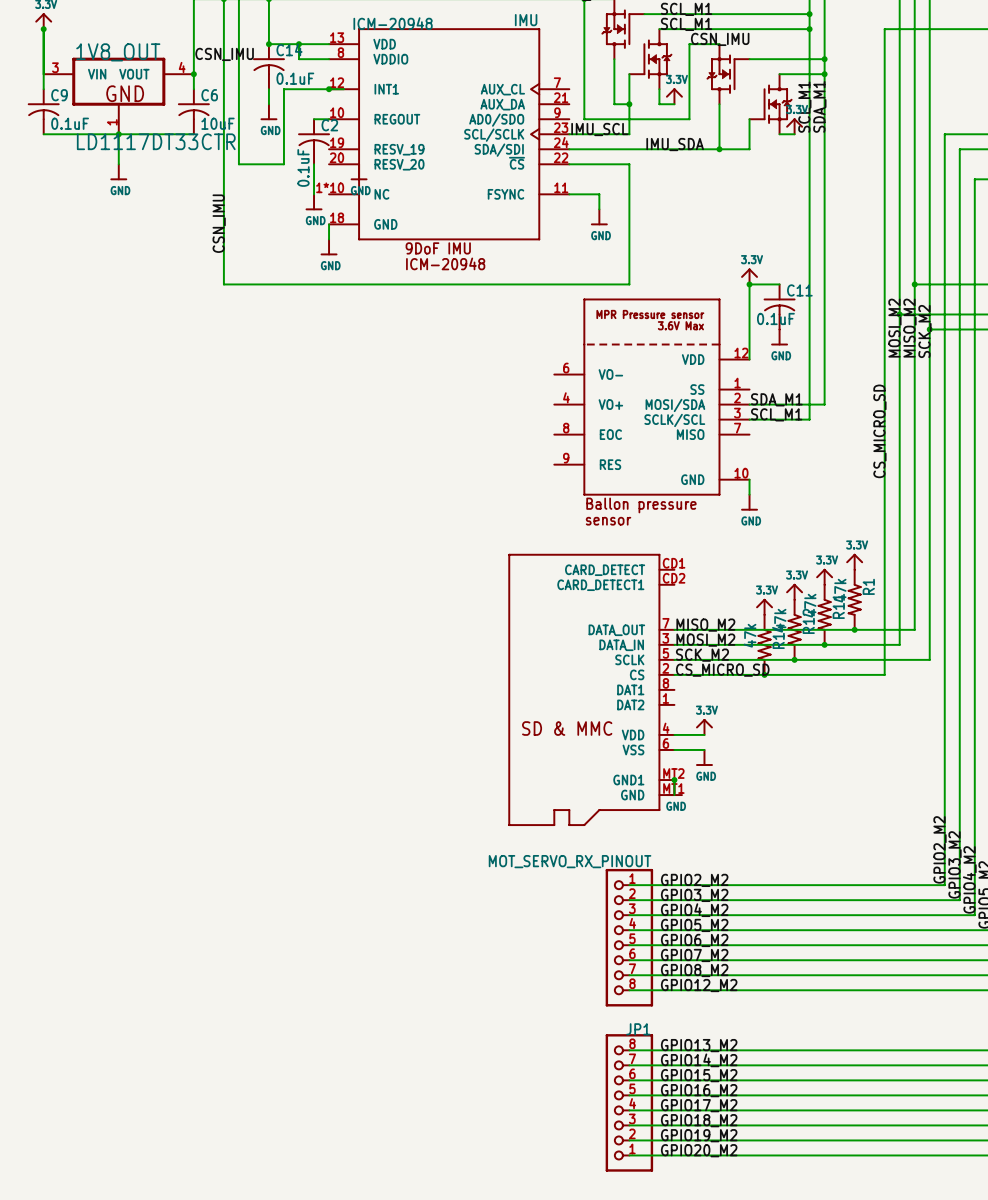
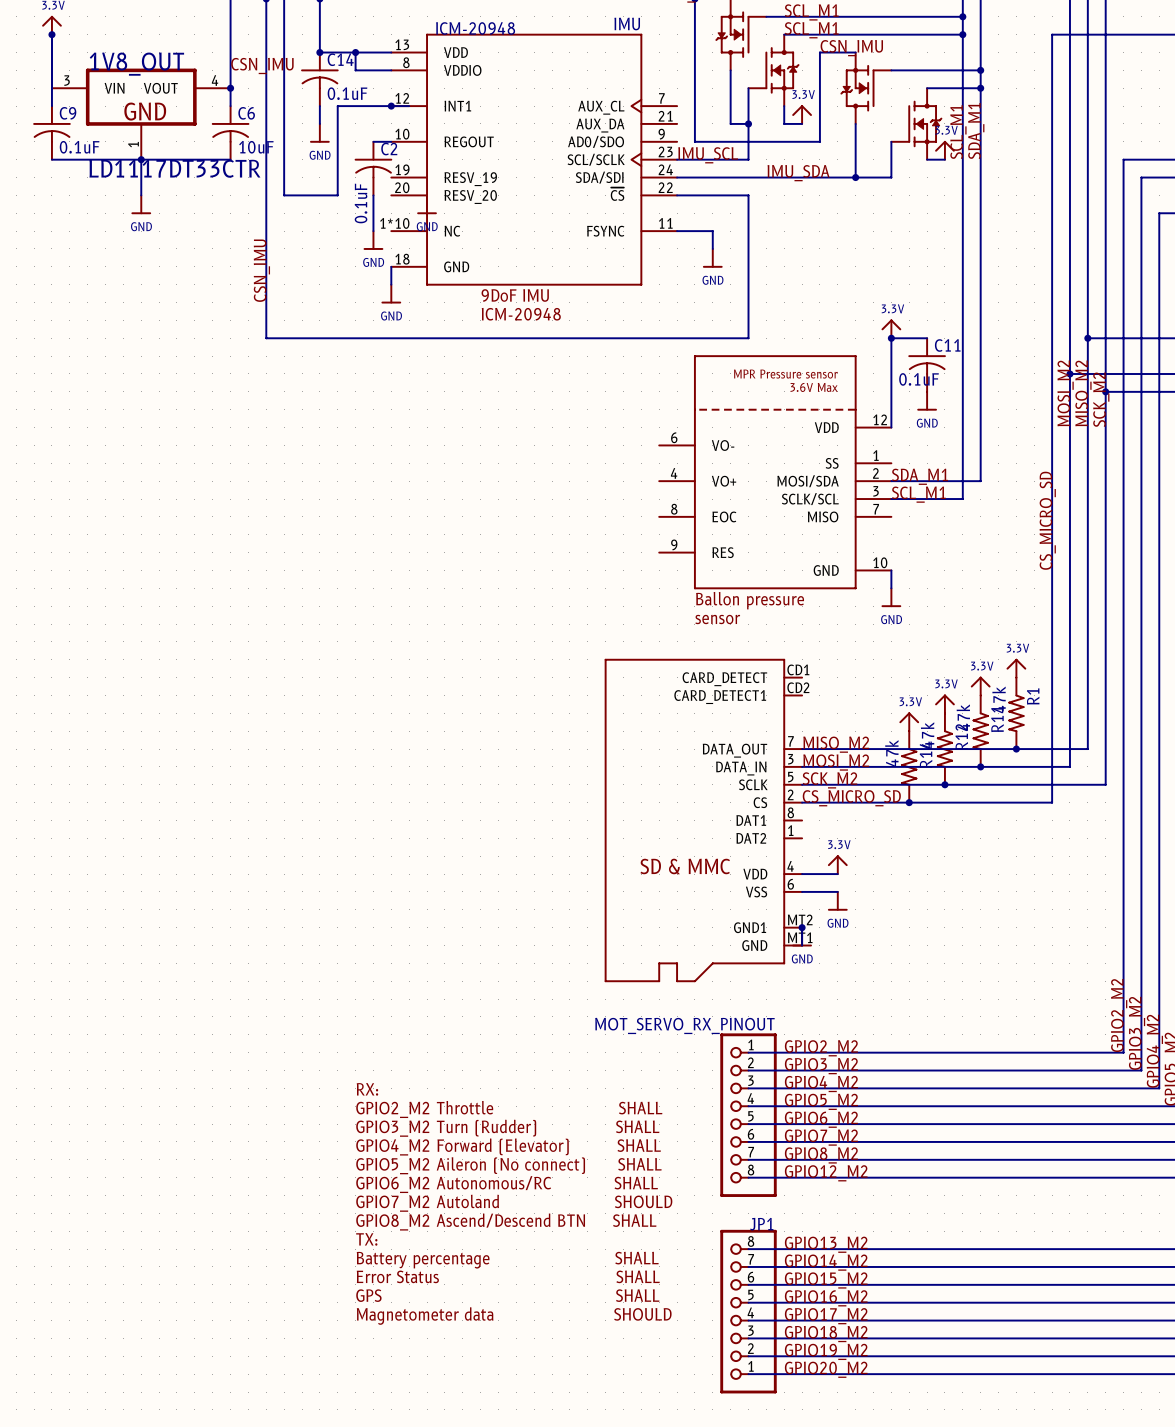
text: none -> RX: (367, 1089)
text: none -> GPIO2_M2 Throttle SHALL (509, 1109)
text: none -> GPIO3_M2 Turn (Rudder) SHALL (507, 1128)
text: none -> GPIO4_M2 Forward (Elevator) SHALL (508, 1147)
text: none -> GPIO5_M2 Aileron (No connect) SHALL (508, 1165)
text: none -> GPIO6_M2 Autonomous/RC SHALL (507, 1184)
text: none -> GPIO7_M2 Autoland SHOULD (514, 1203)
text: none -> GPIO8_M2 Ascend/Descend BTN SHALL (506, 1222)
text: none -> TX: (366, 1239)
text: none -> Battery percentage SHALL (507, 1260)
text: none -> Error Status SHALL (508, 1276)
text: none -> GPS SHALL (507, 1295)
text: none -> Magnetometer data SHOULD (514, 1316)

